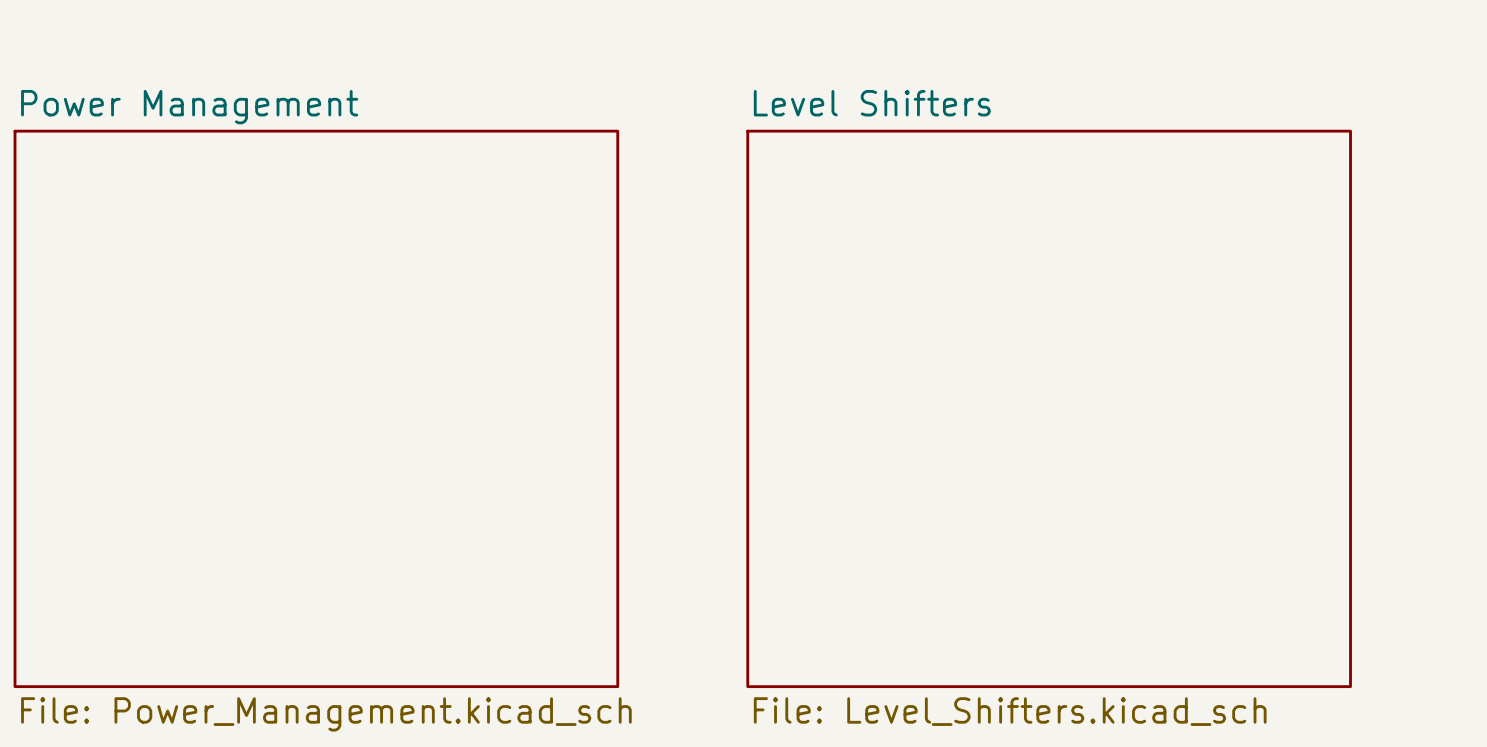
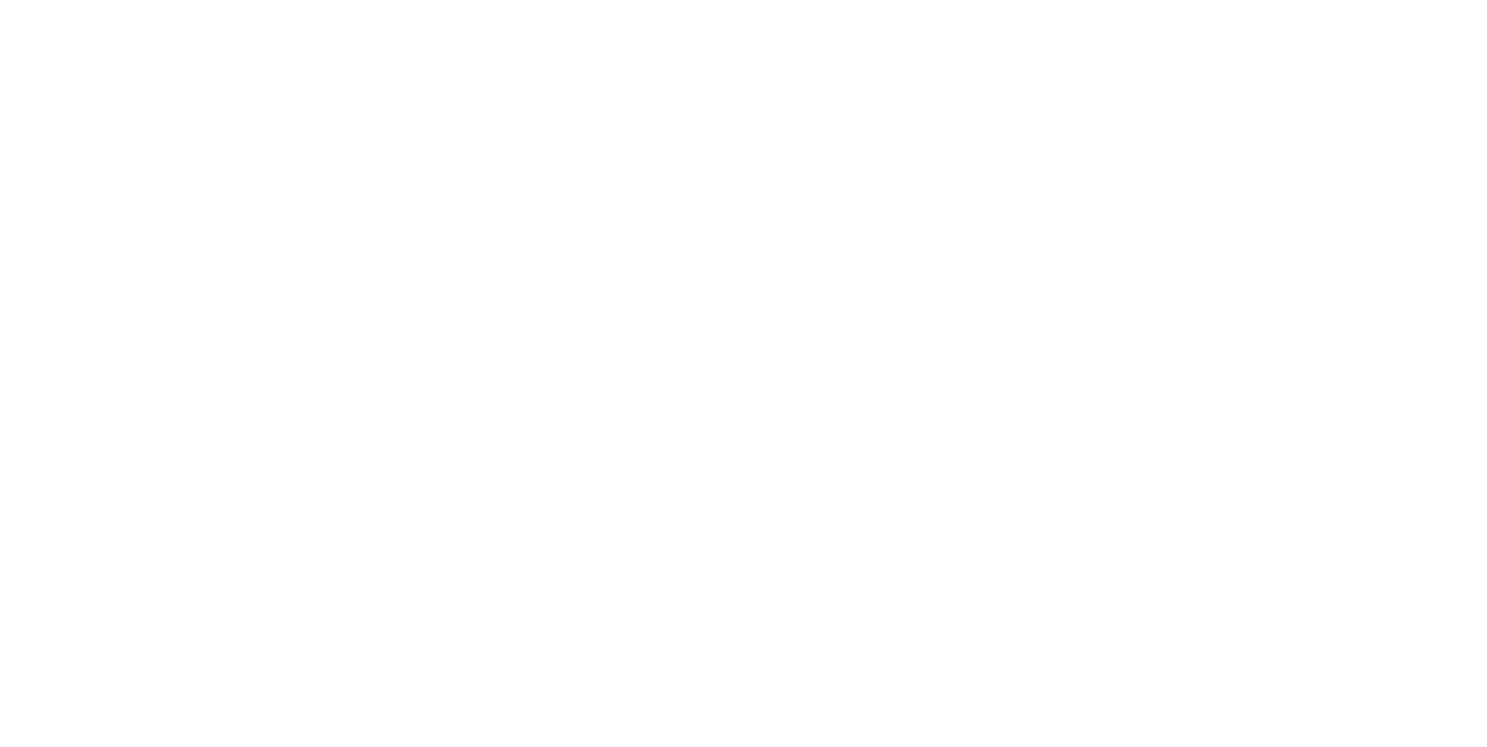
sheet Power Management: File: Power_Management.kicad_sch (316, 408) -> none
sheet Level Shifters: File: Level_Shifters.kicad_sch (1049, 408) -> none

